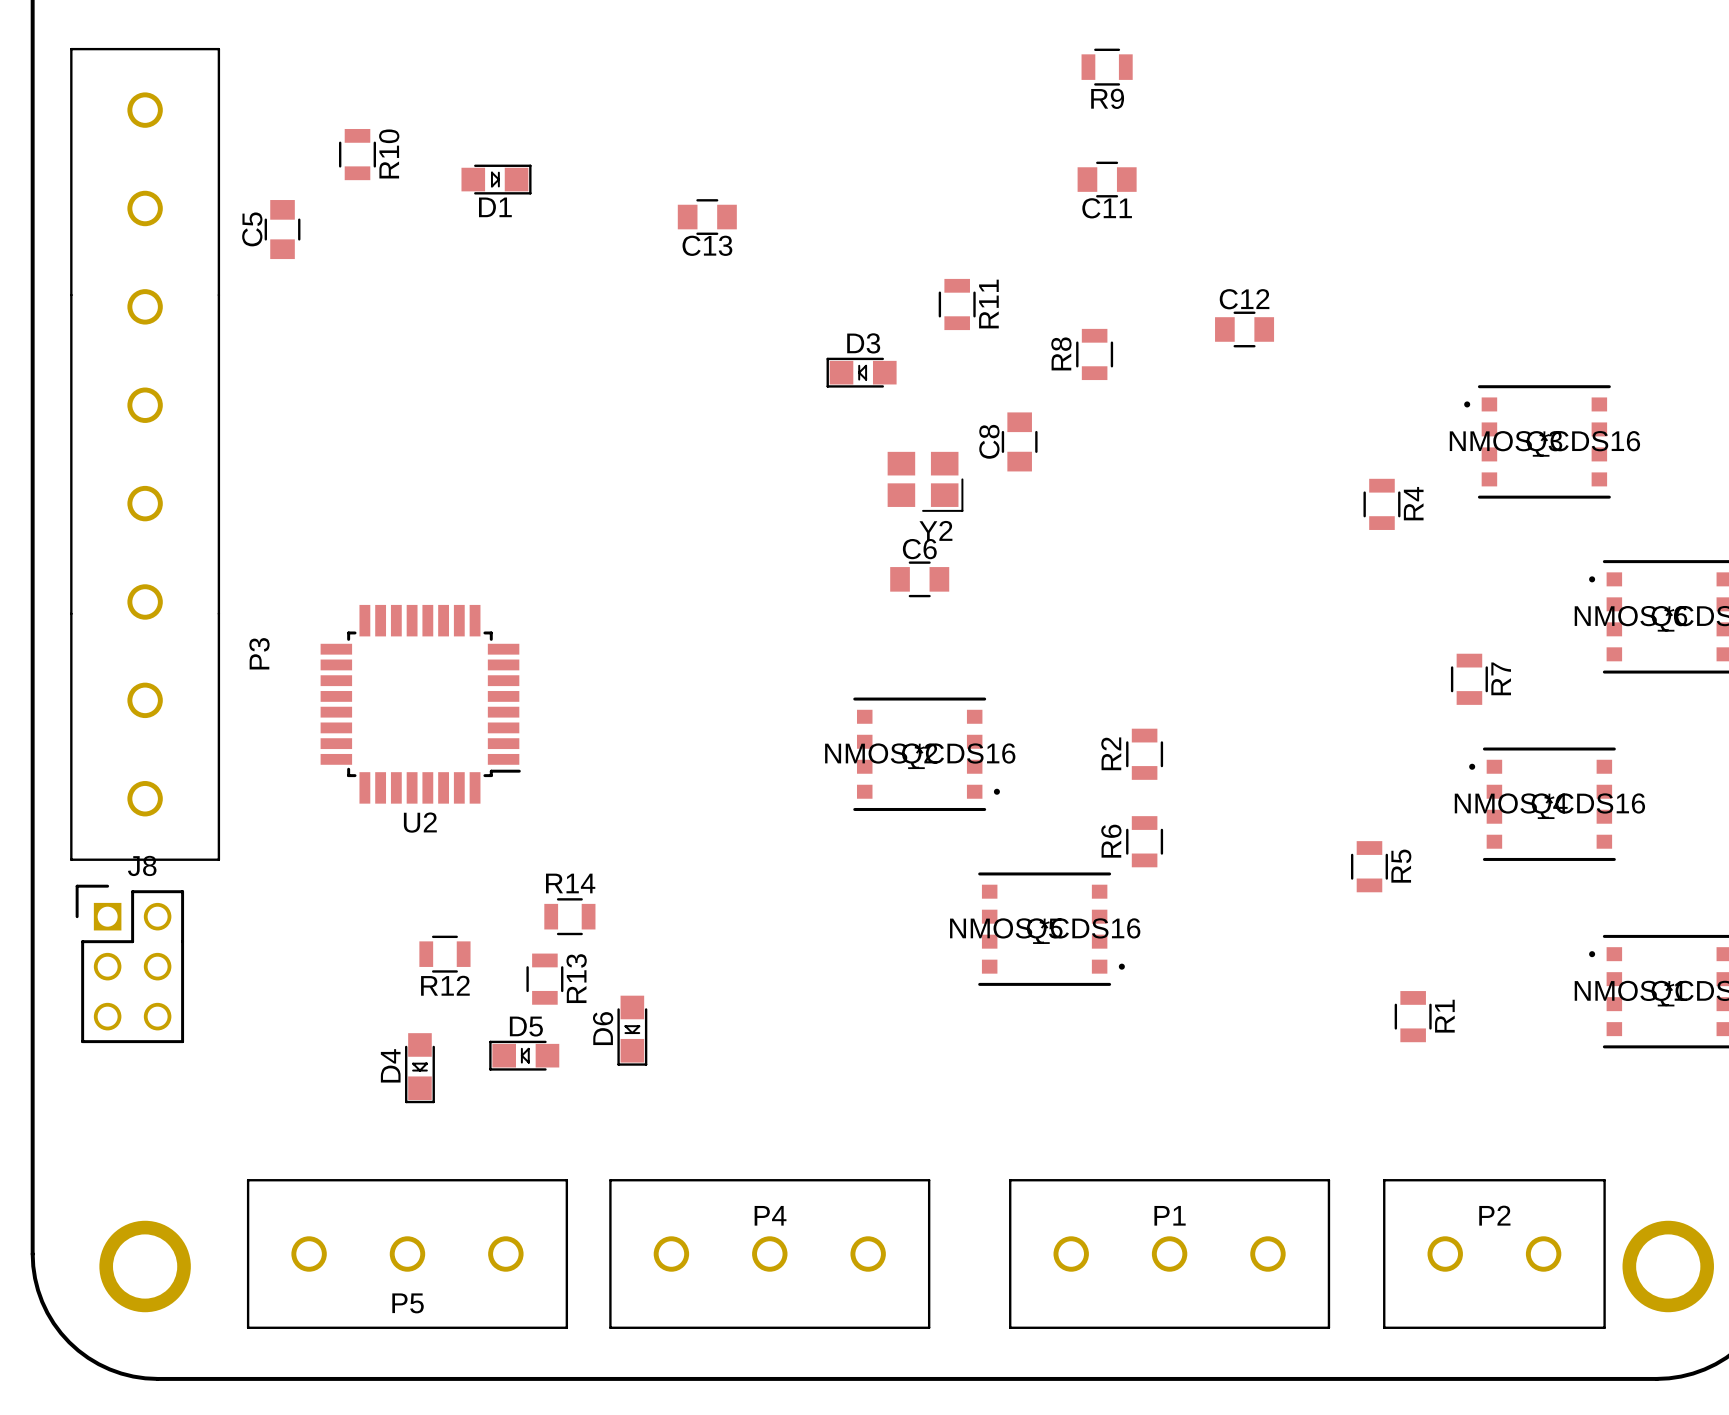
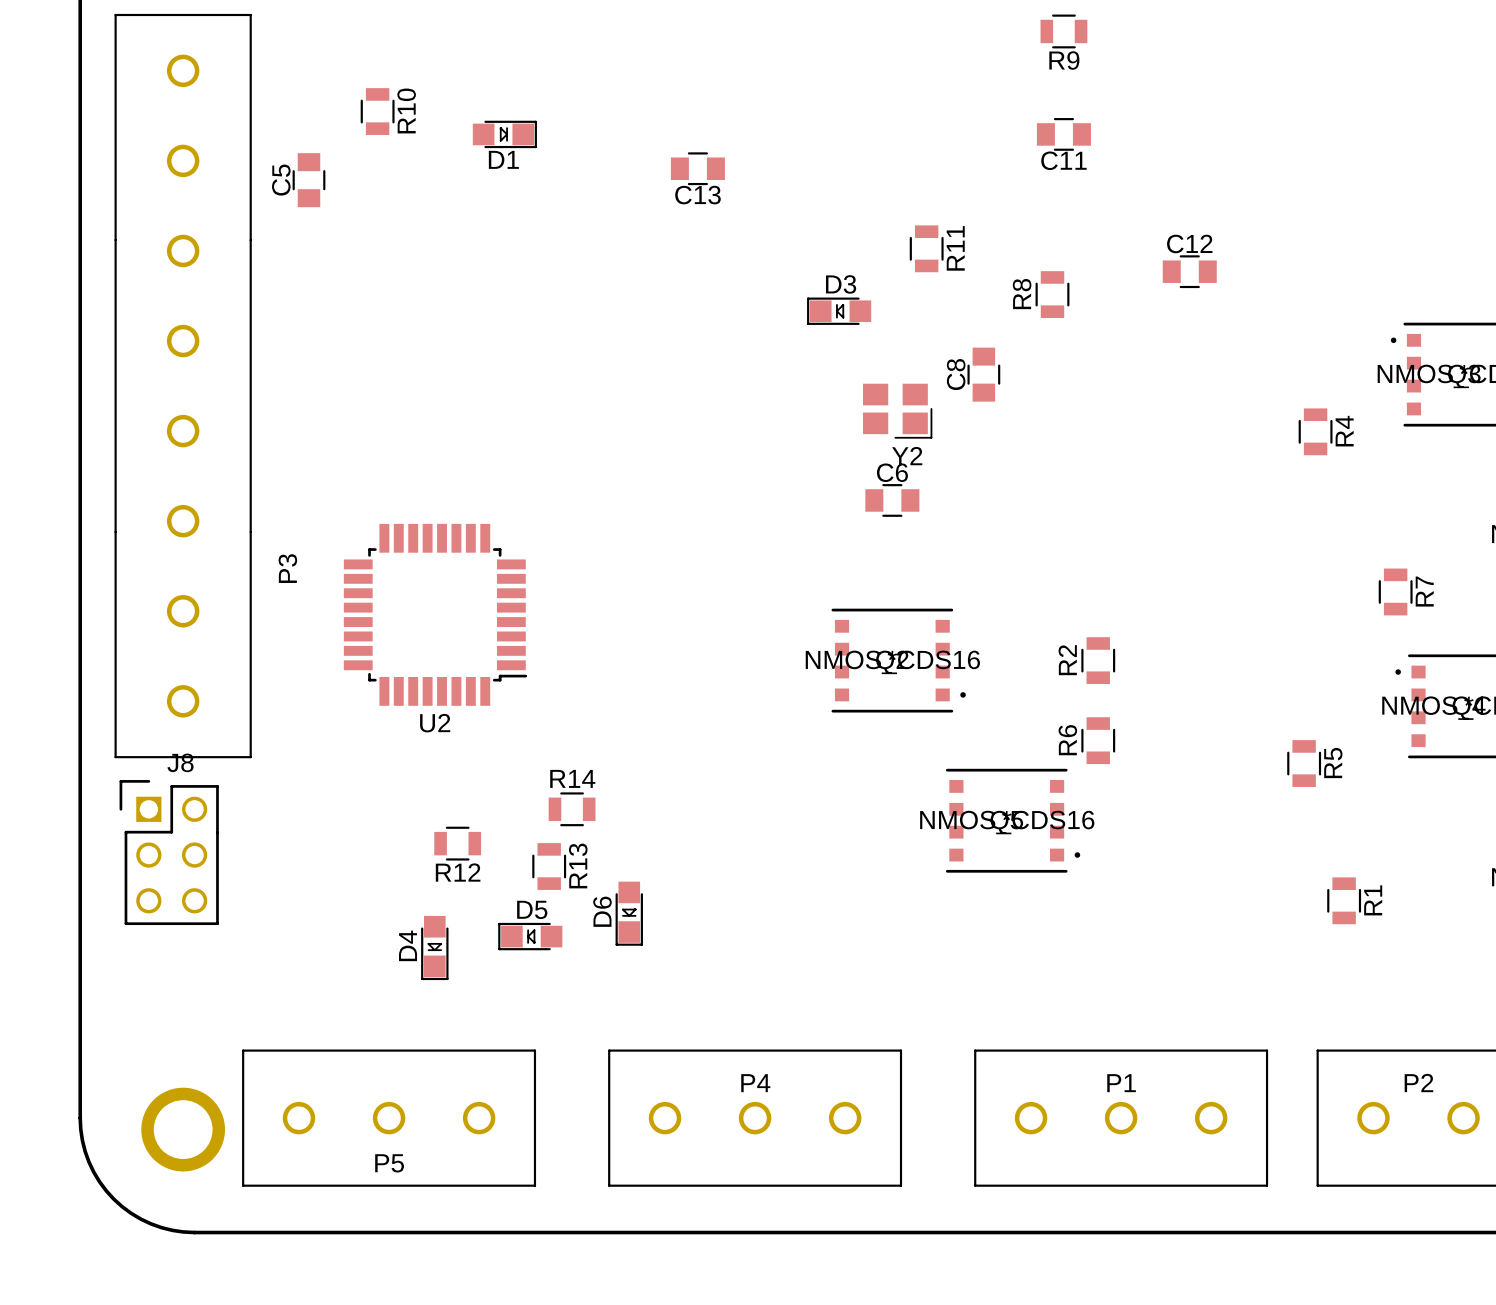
P5 position: (407, 1254) -> (389, 1118)

